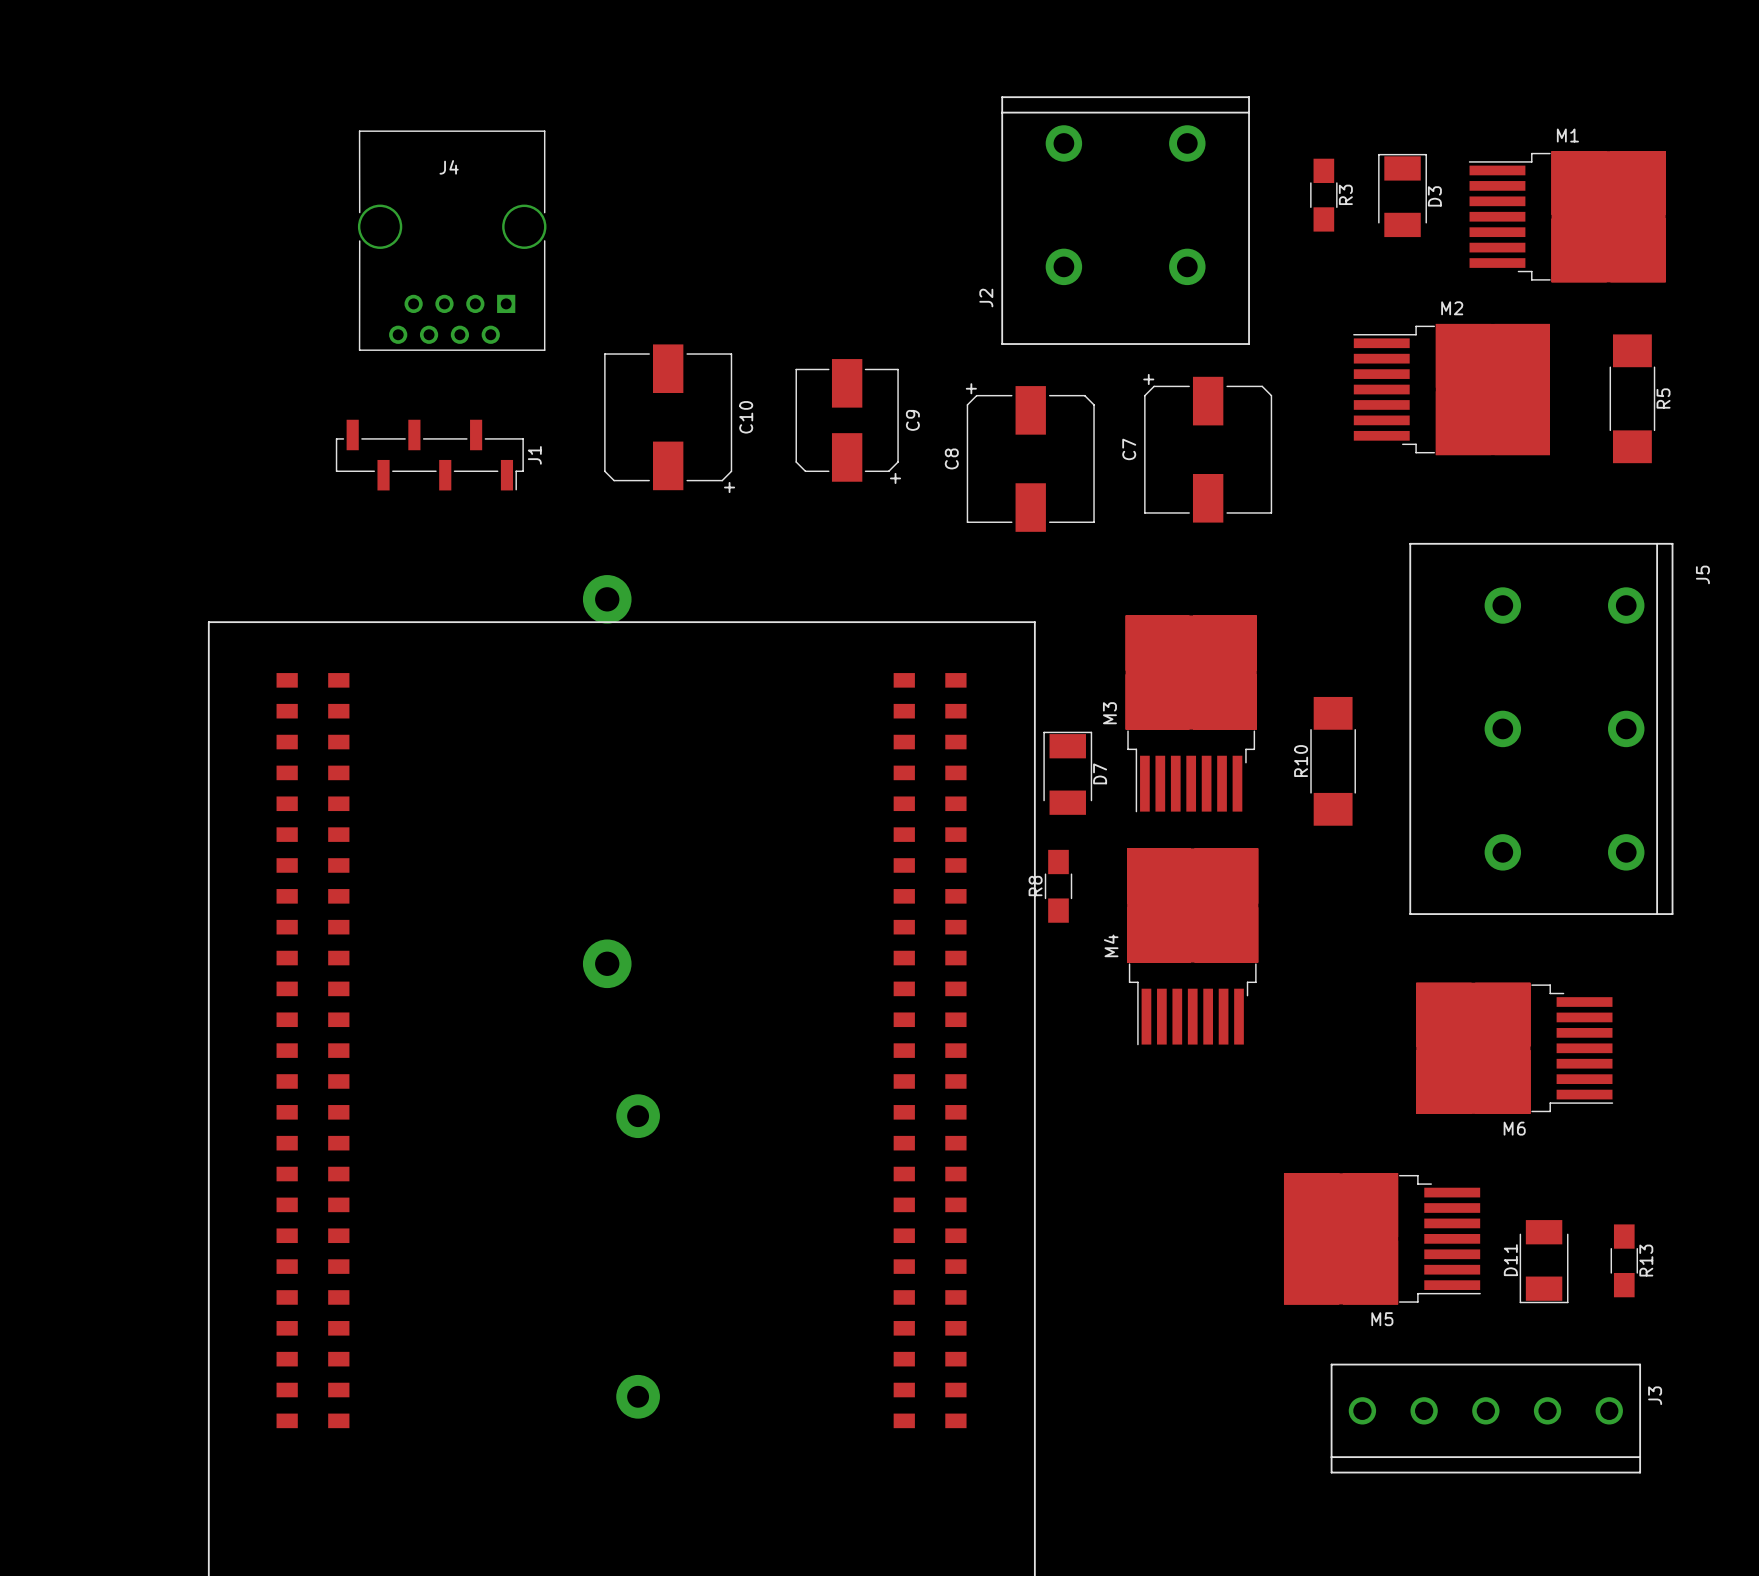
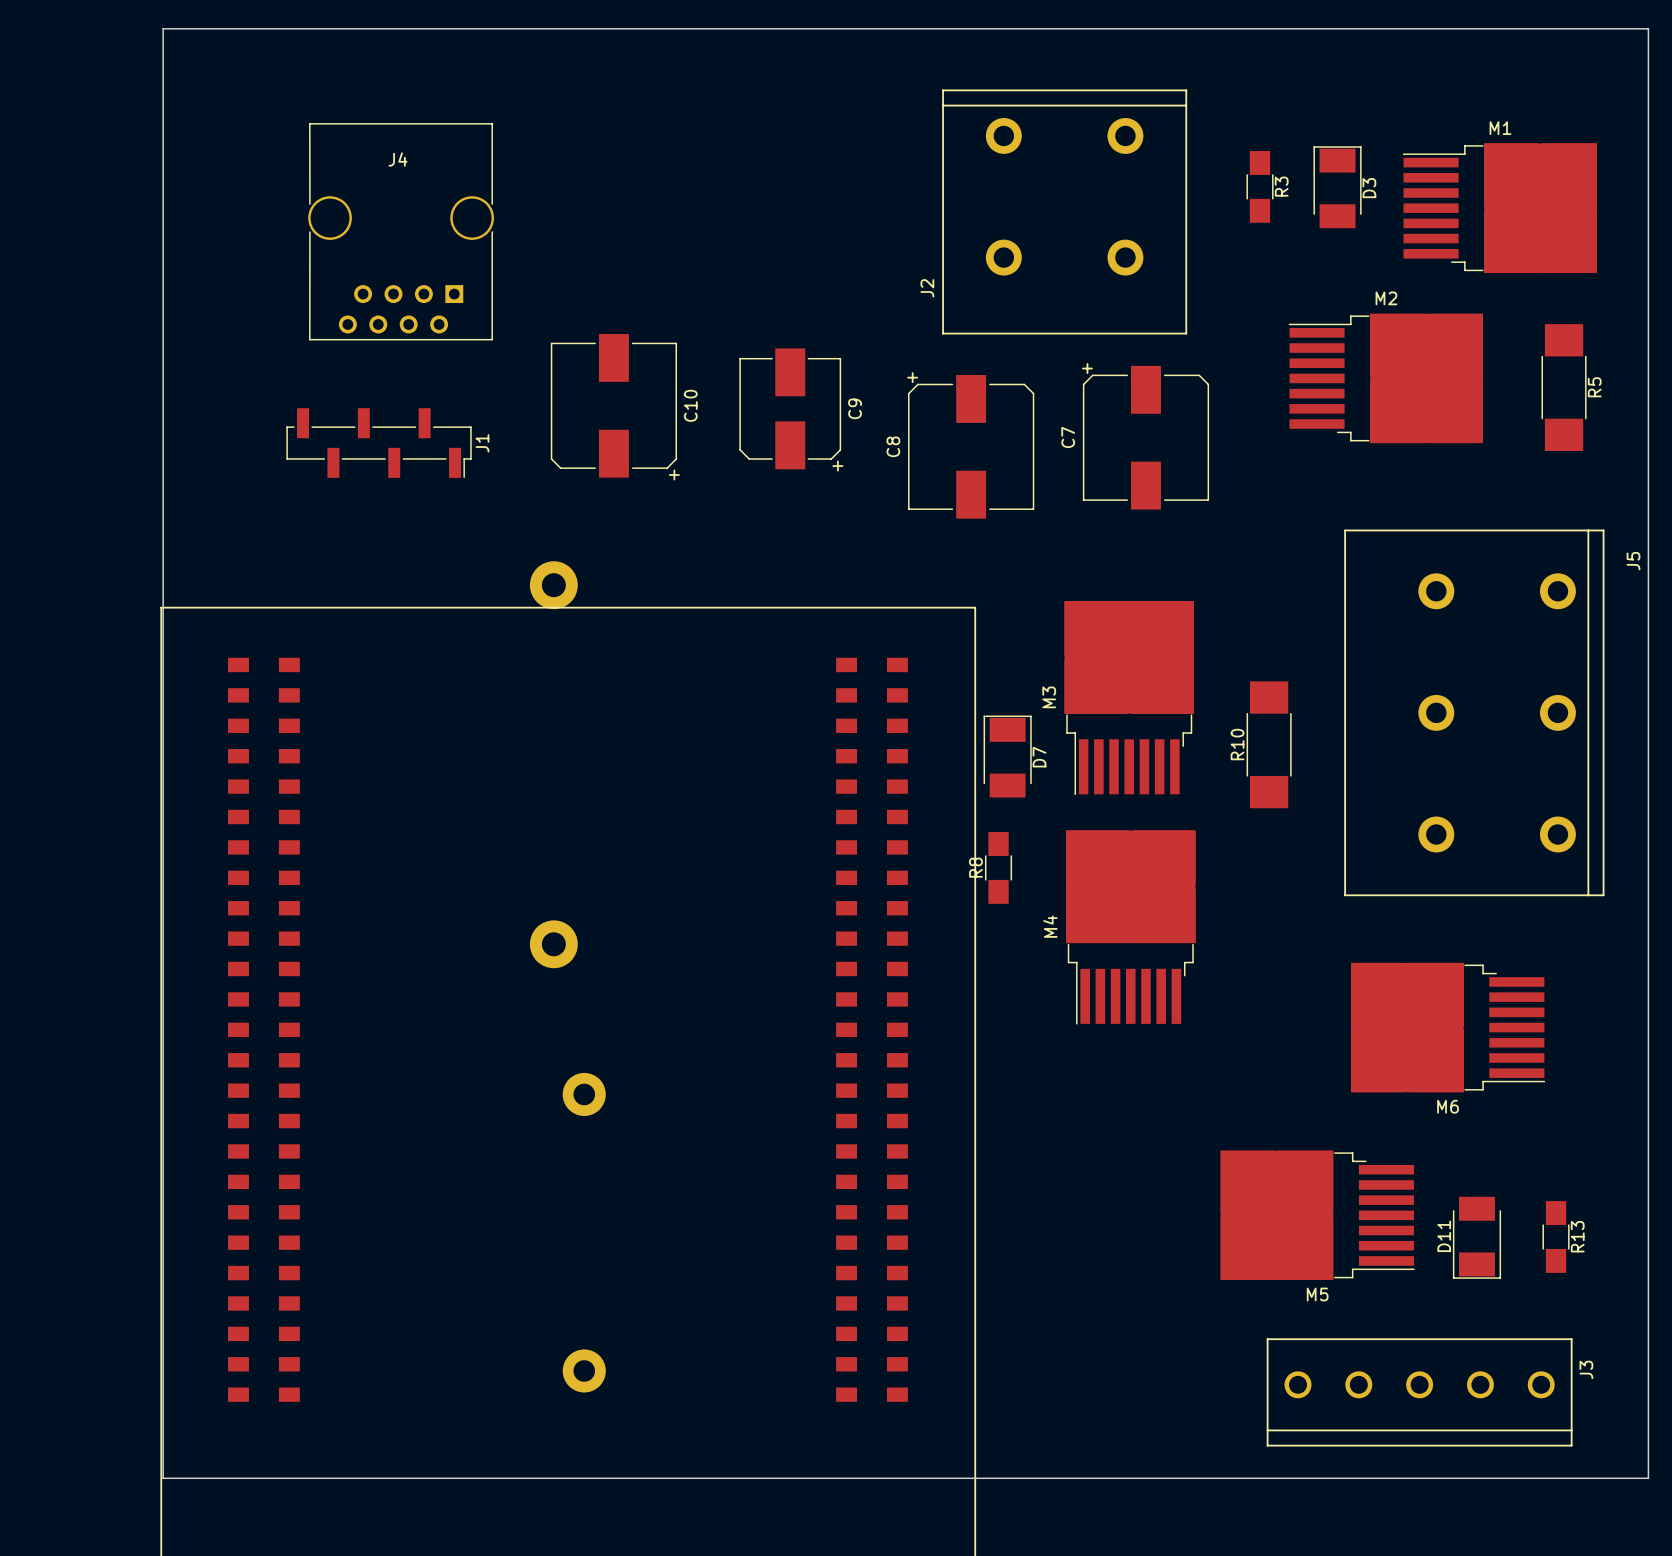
board edge: none -> (163, 28) (1648, 28) (1648, 1478) (163, 1478) (163, 28)

